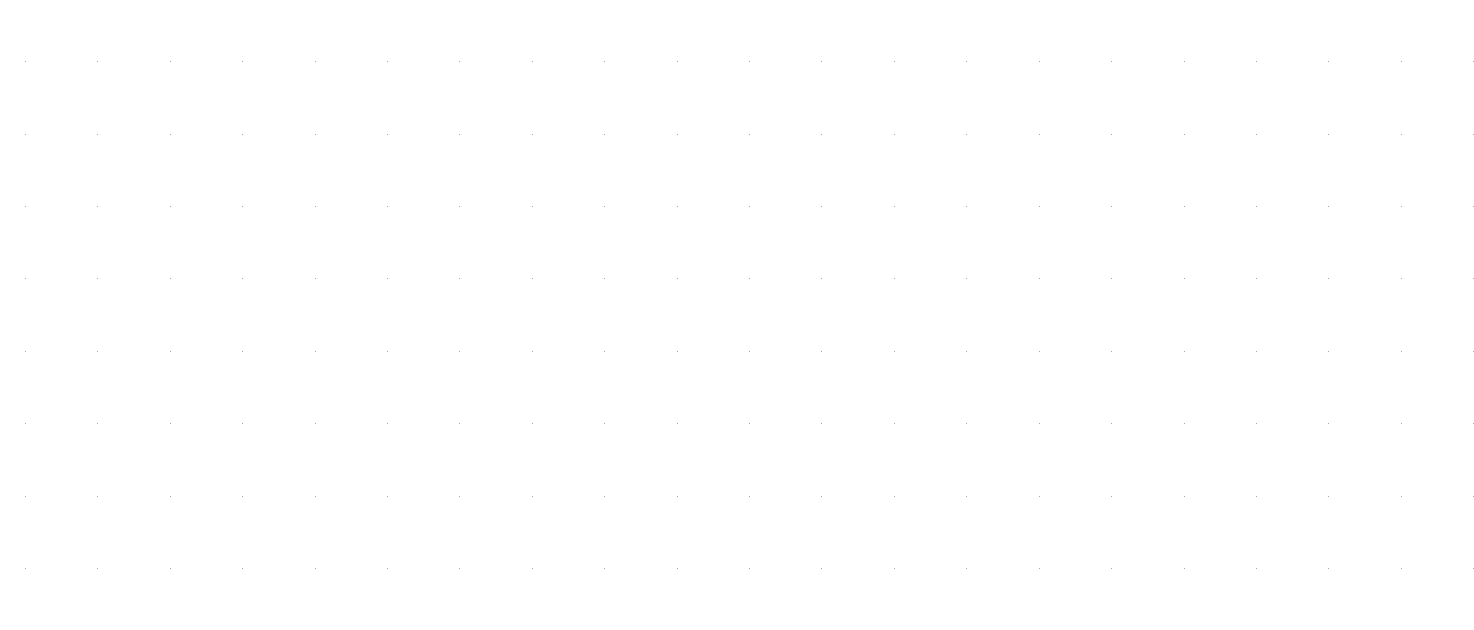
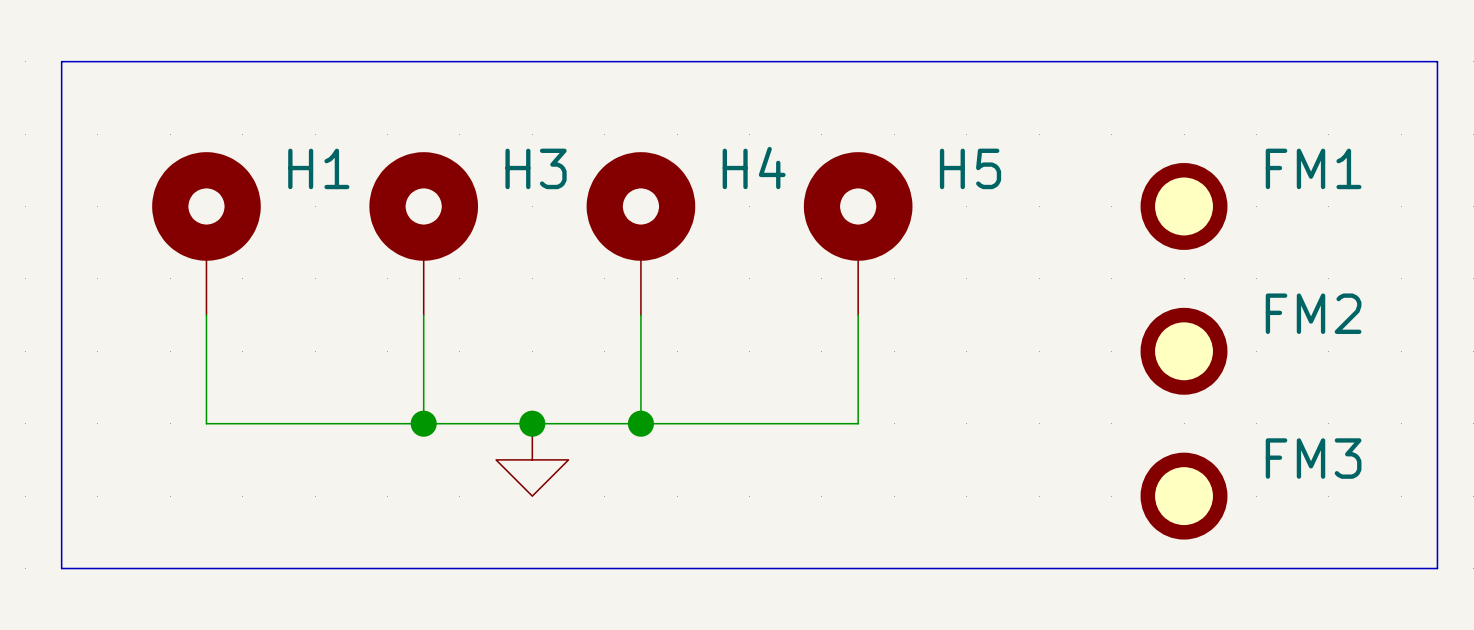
line: none -> (61, 61) (1437, 61) (1437, 568) (61, 568) (61, 61)
FM1: none -> (1184, 206)
H1: none -> (206, 233)
H3: none -> (423, 233)
H4: none -> (640, 233)
H5: none -> (858, 233)
wire: none -> (206, 315) (206, 423) (858, 423) (858, 315)
wire: none -> (423, 315) (423, 423)
wire: none -> (640, 315) (640, 423)
FM2: none -> (1184, 351)
junction: none -> (423, 423)
junction: none -> (532, 423)
junction: none -> (640, 423)
power symbol: none -> (532, 459)
FM3: none -> (1184, 496)

